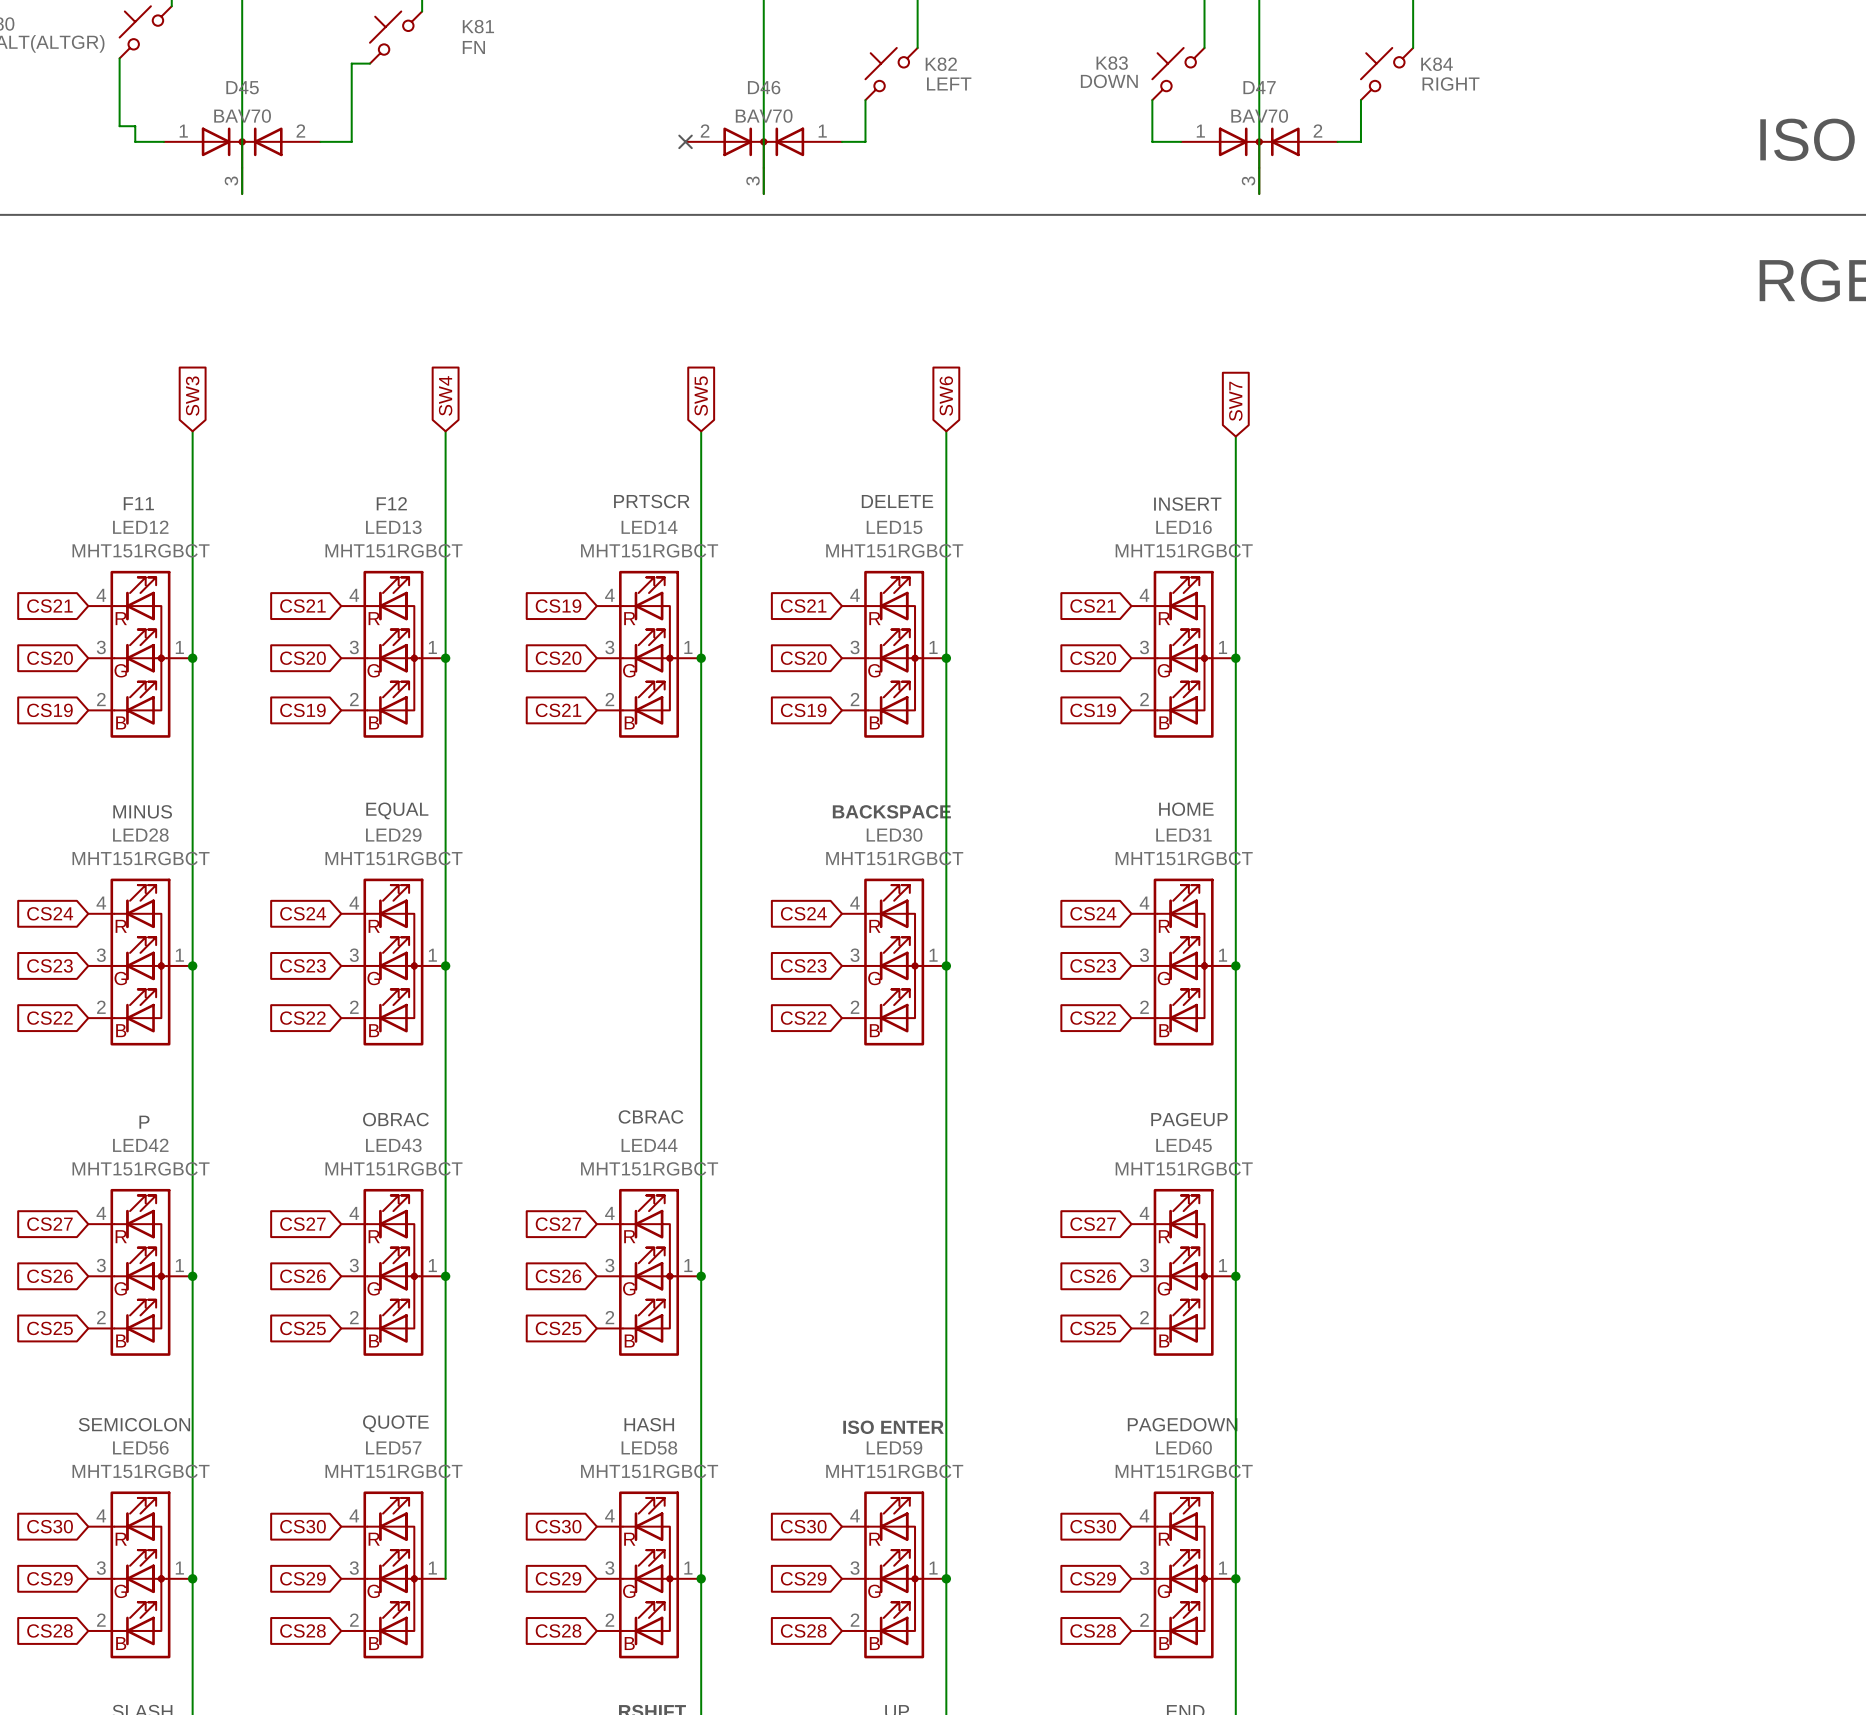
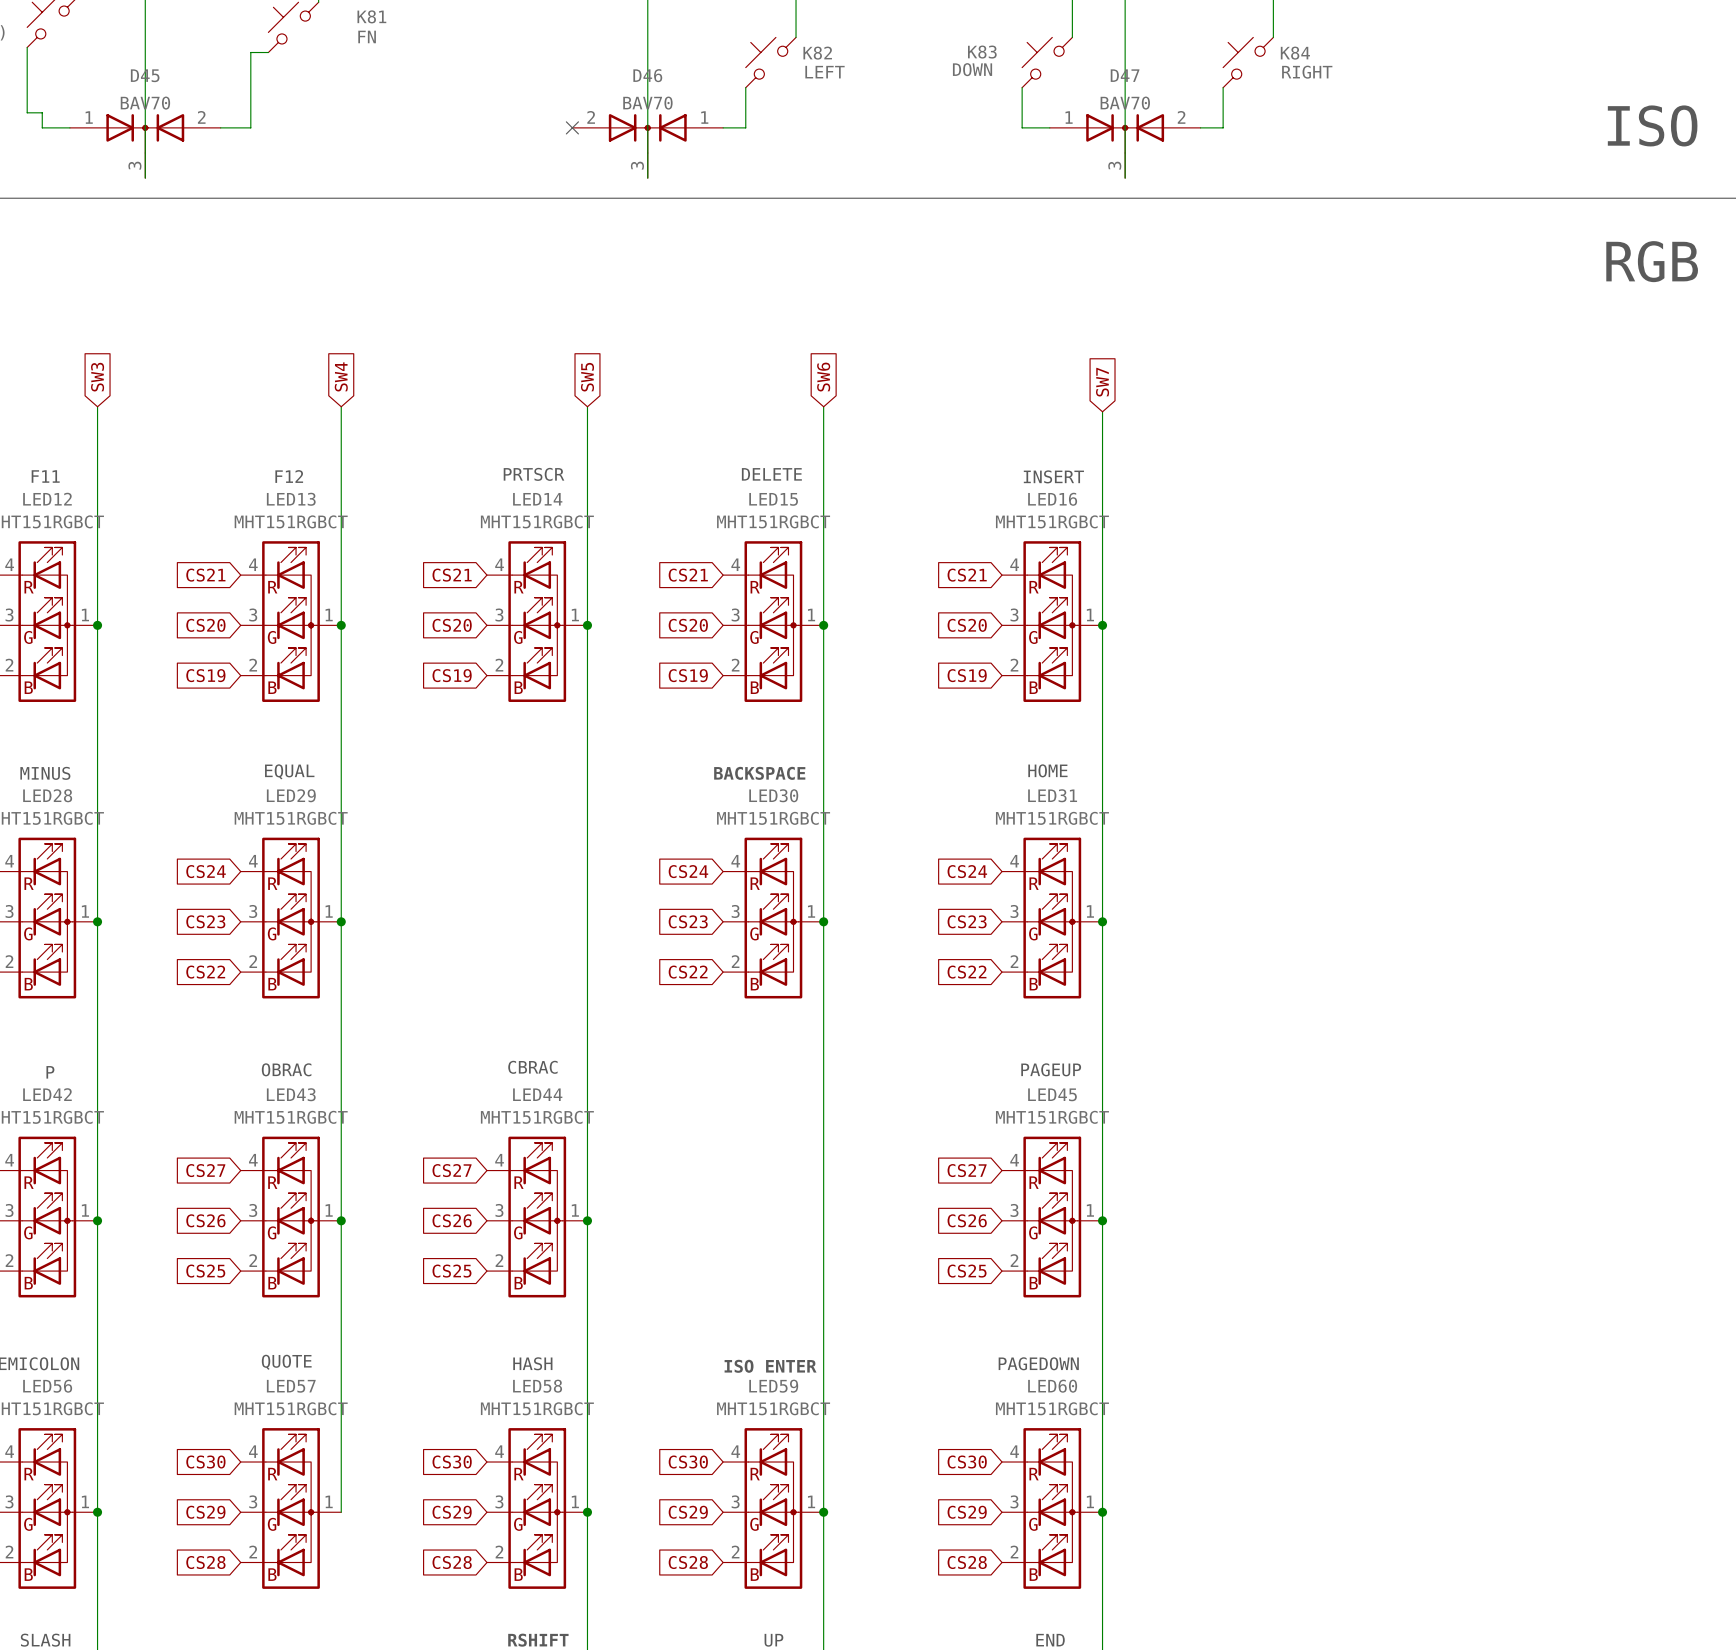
global label: CS19 (558, 606) -> CS21 (452, 575)
global label: CS21 (558, 710) -> CS19 (452, 675)

